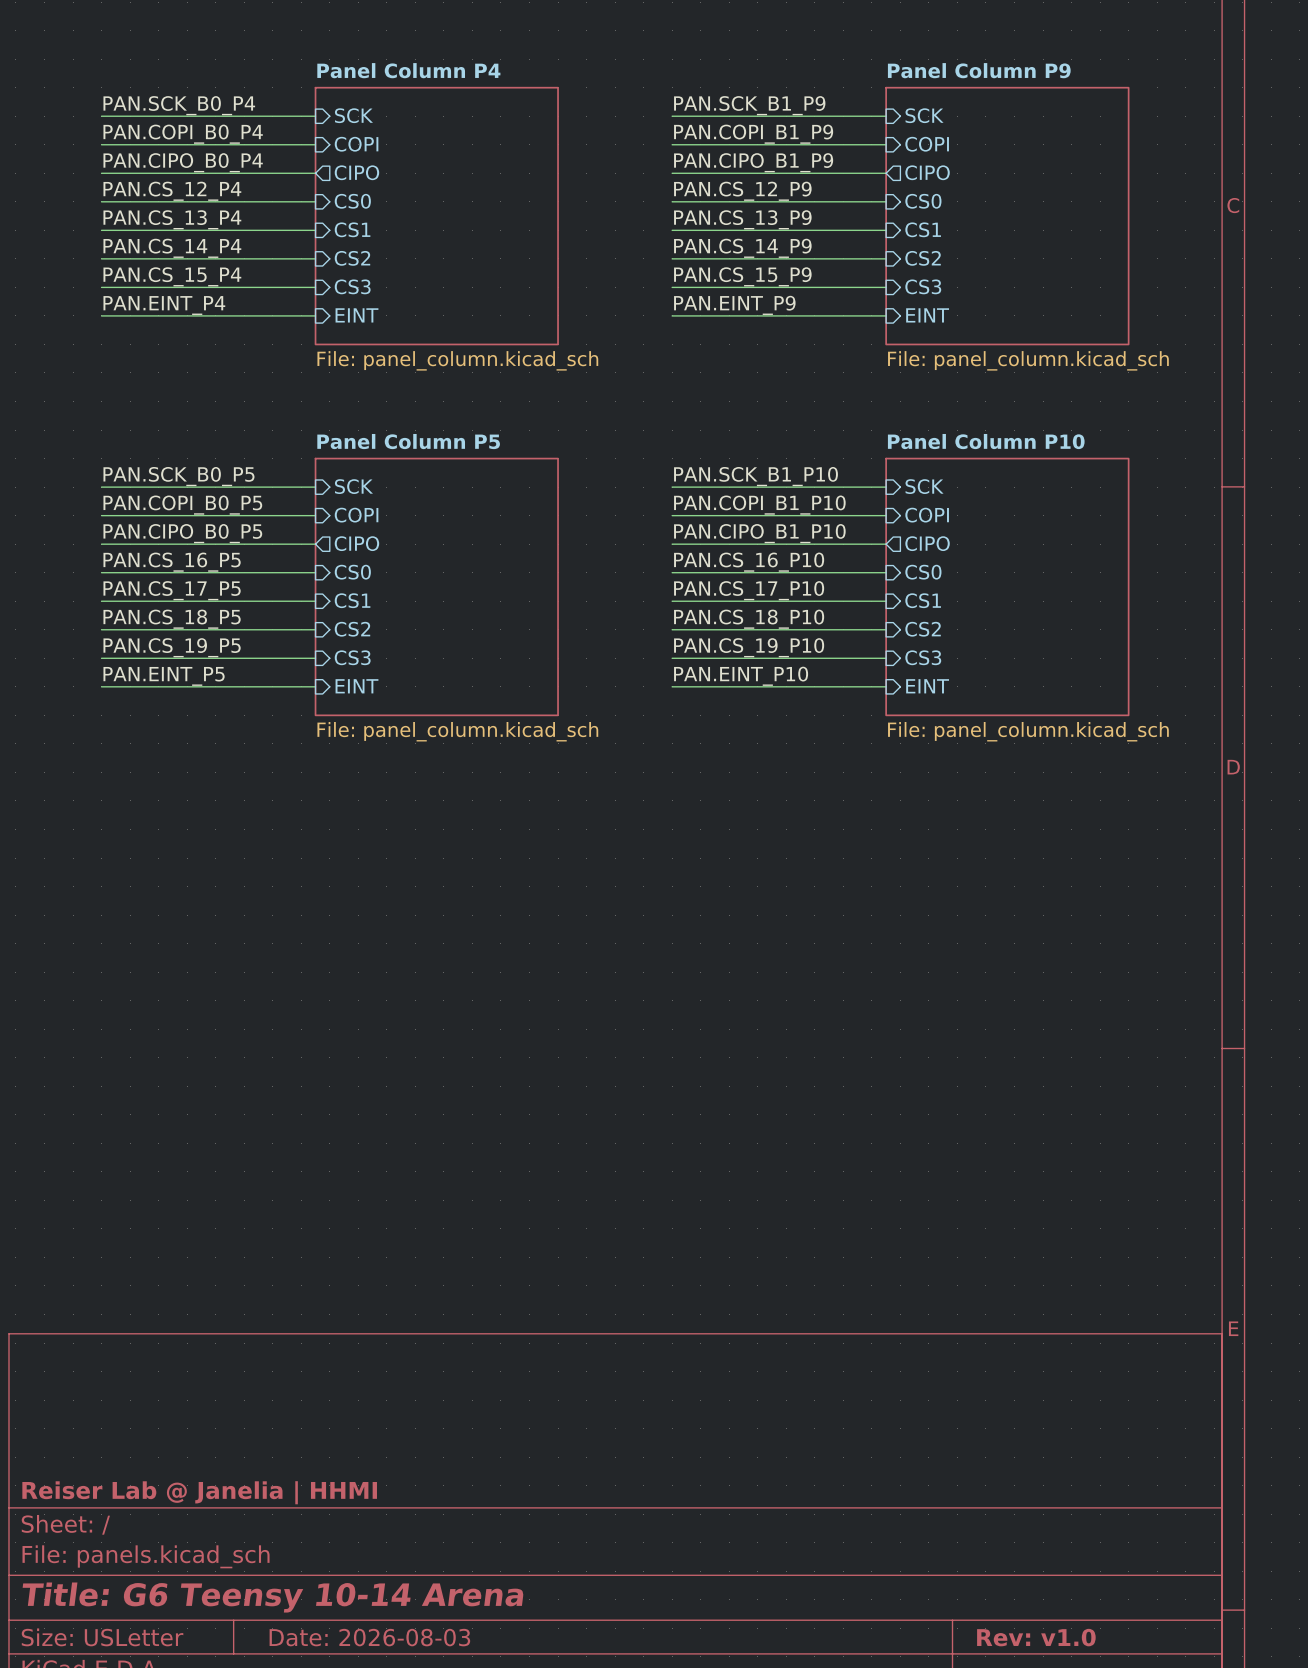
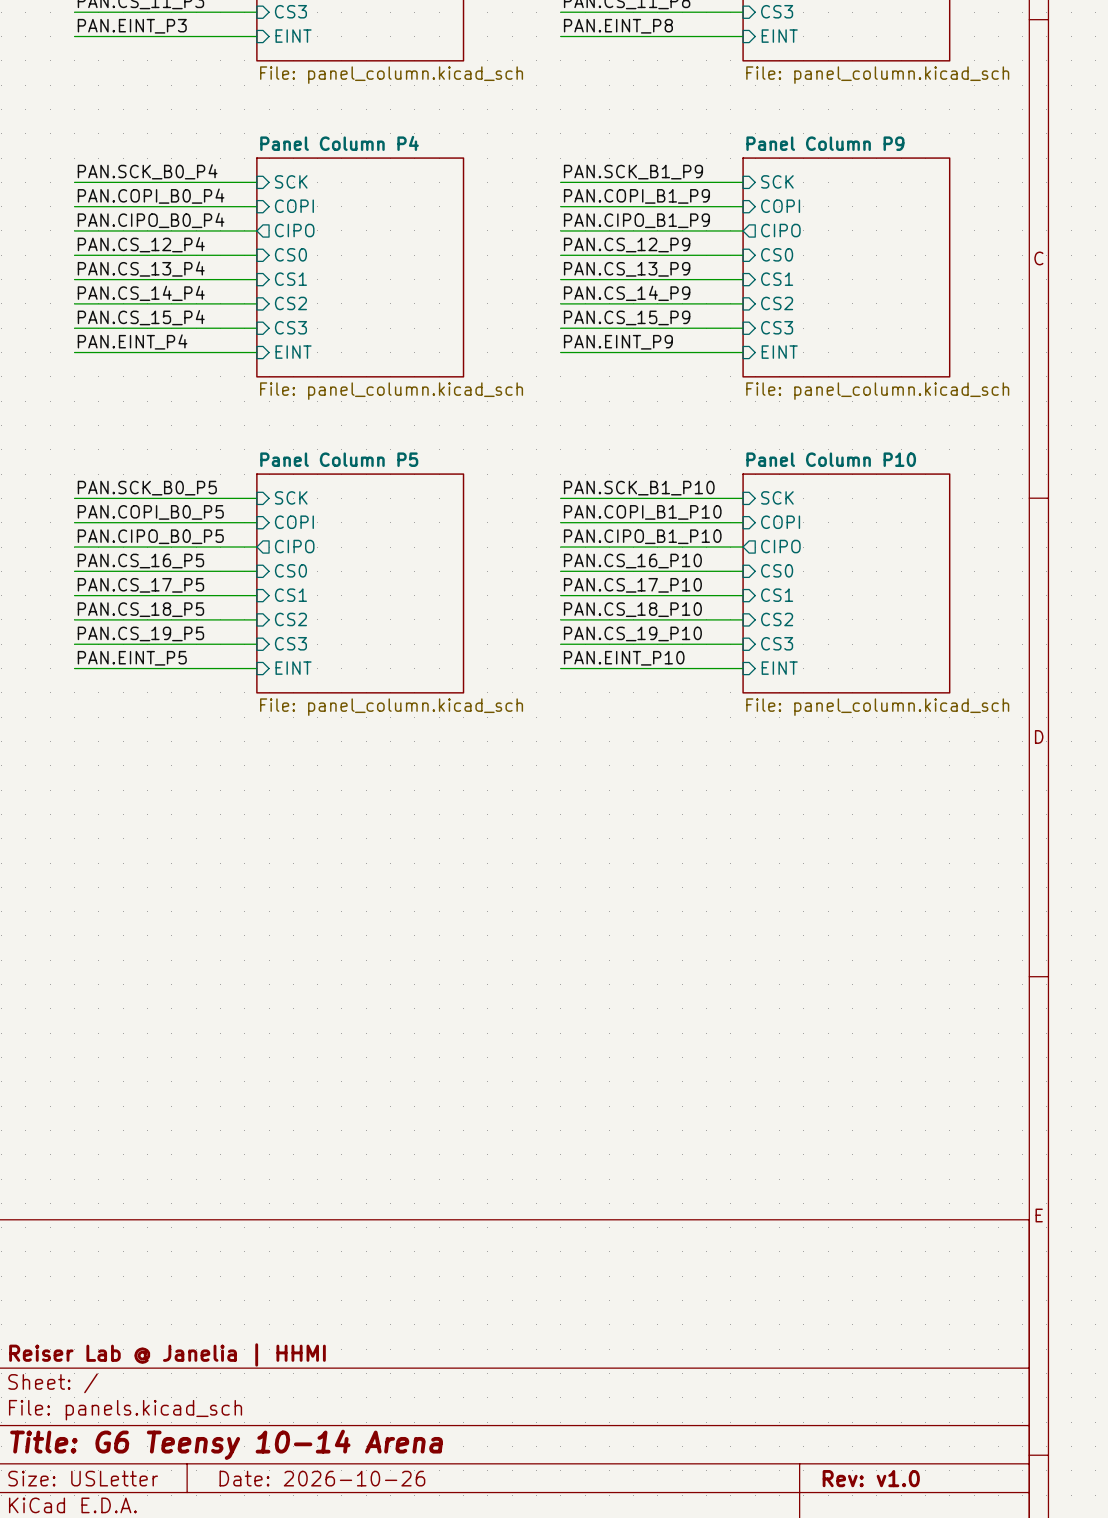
title block: Date: 2026-08-03 (369, 1637) -> Date: 2026-10-26 (322, 1478)

